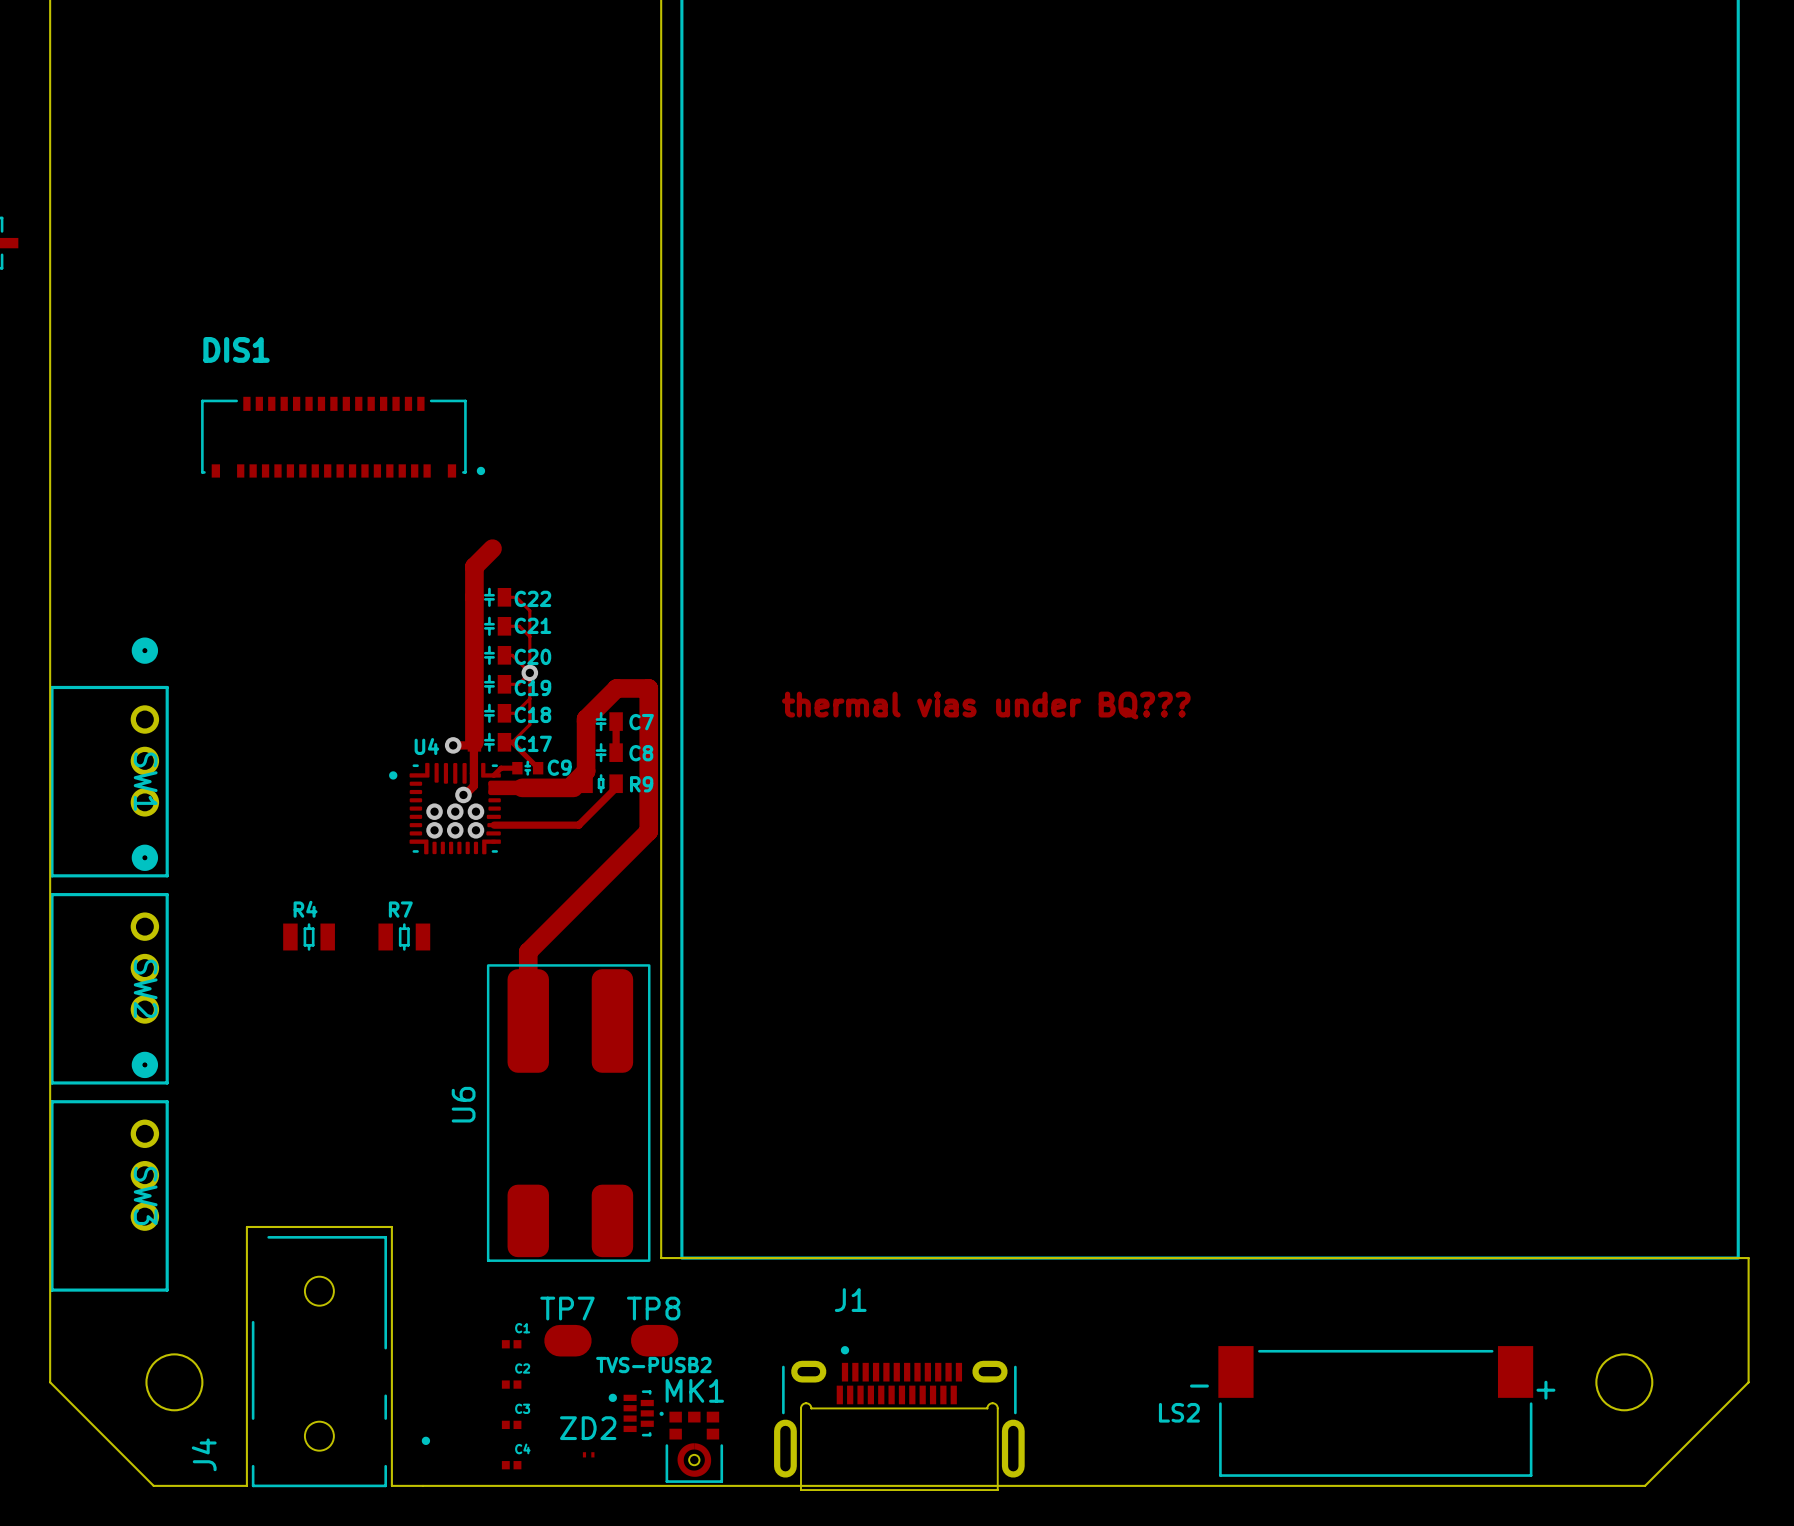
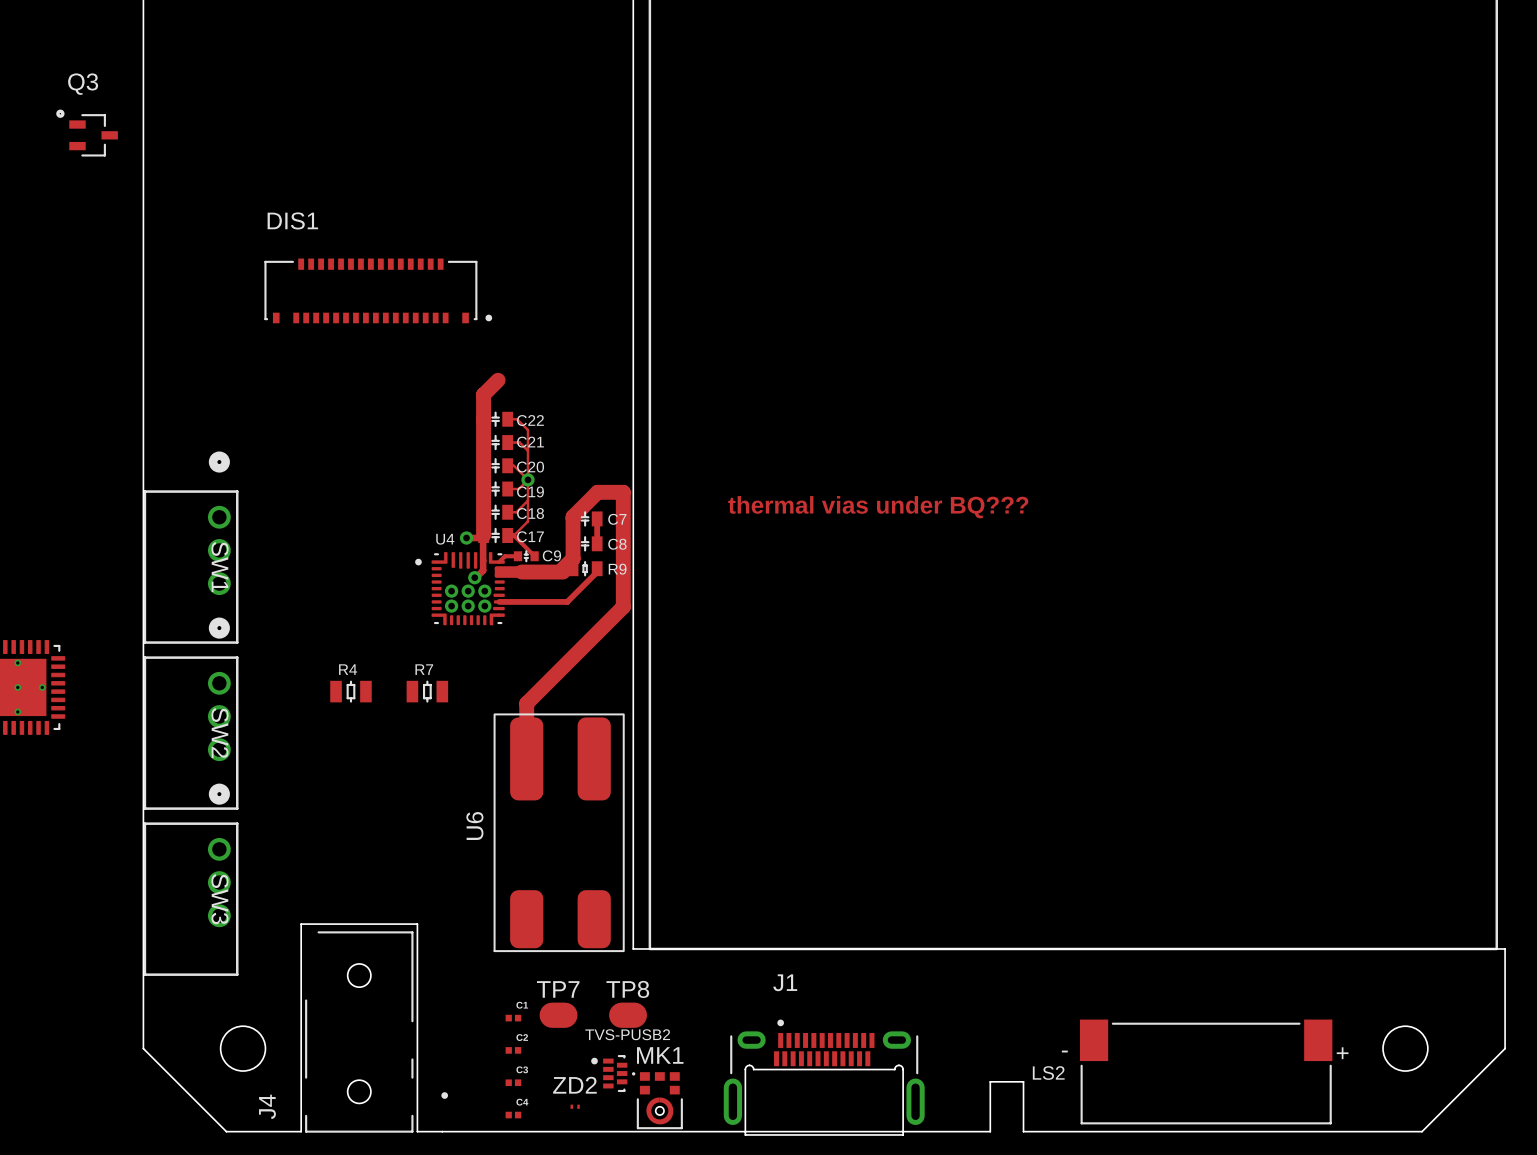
board edge: (1106, 1485) (1147, 1485) -> (990, 1131) (990, 1081) (1023, 1081) (1023, 1131)

